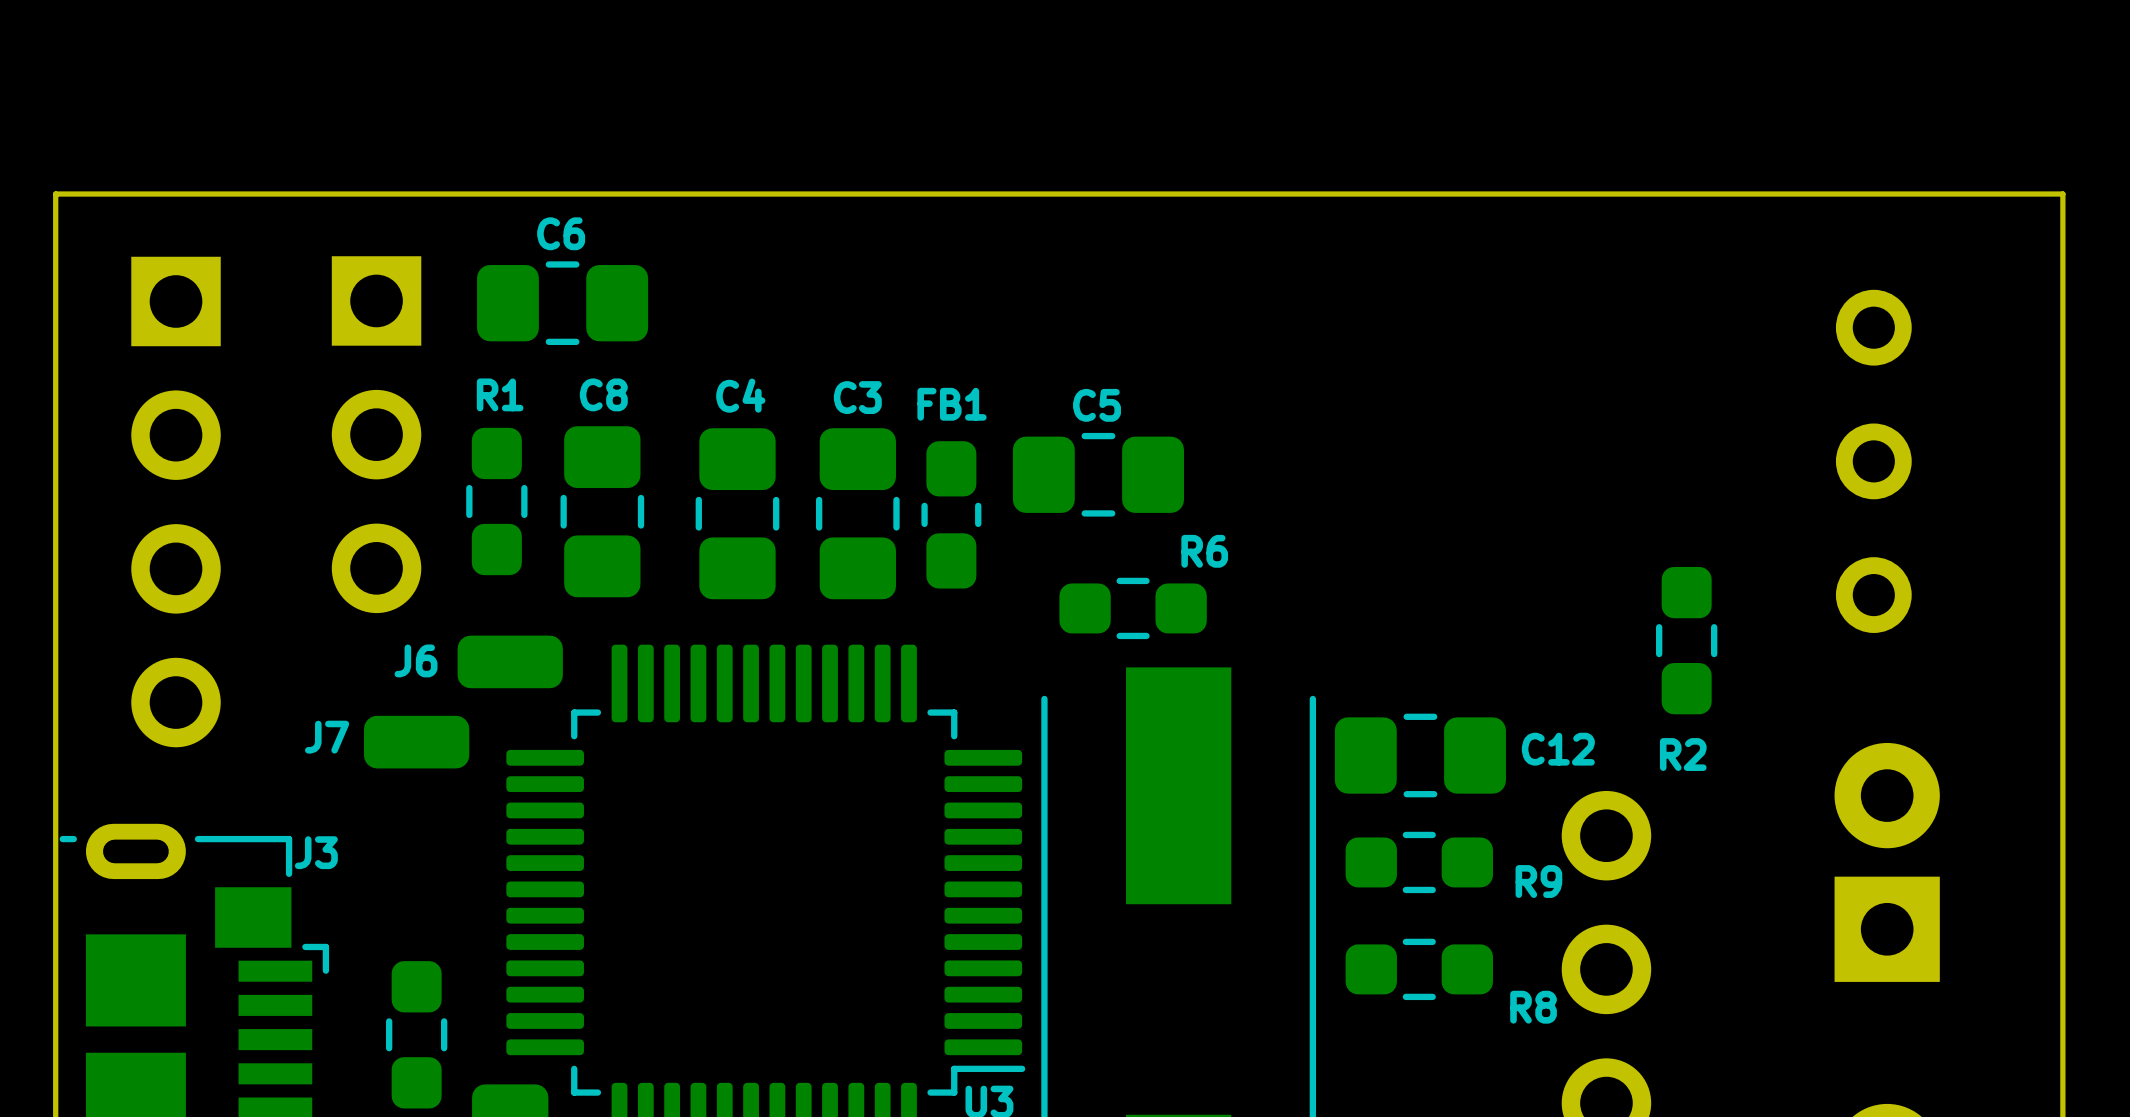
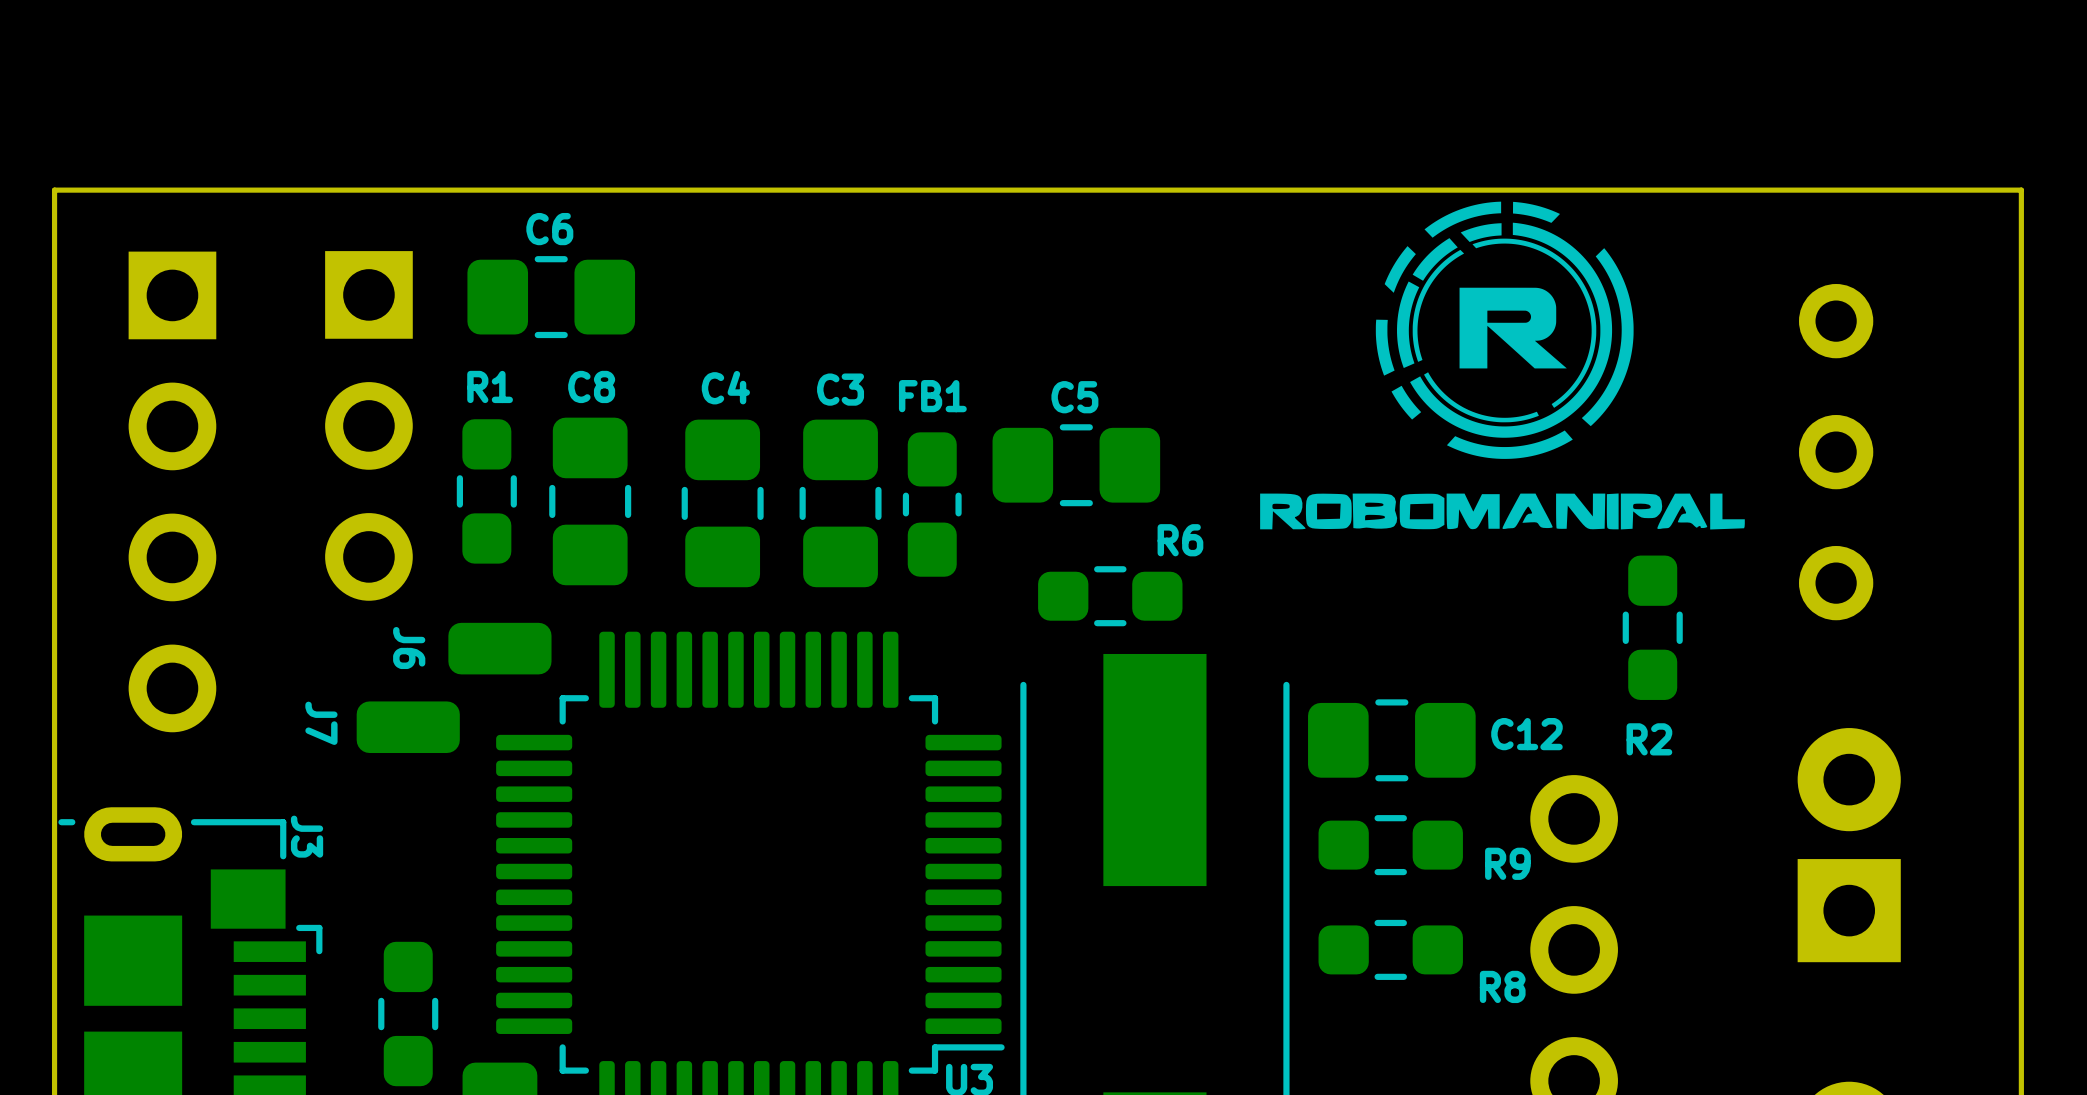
drawing: none -> [1260, 201, 1745, 530]
J6 name rotation: 0° (416, 660) -> 90° clockwise (409, 648)
J7 name rotation: 0° (327, 737) -> 90° clockwise (321, 723)
J3 name rotation: 0° (316, 852) -> 90° clockwise (307, 836)

